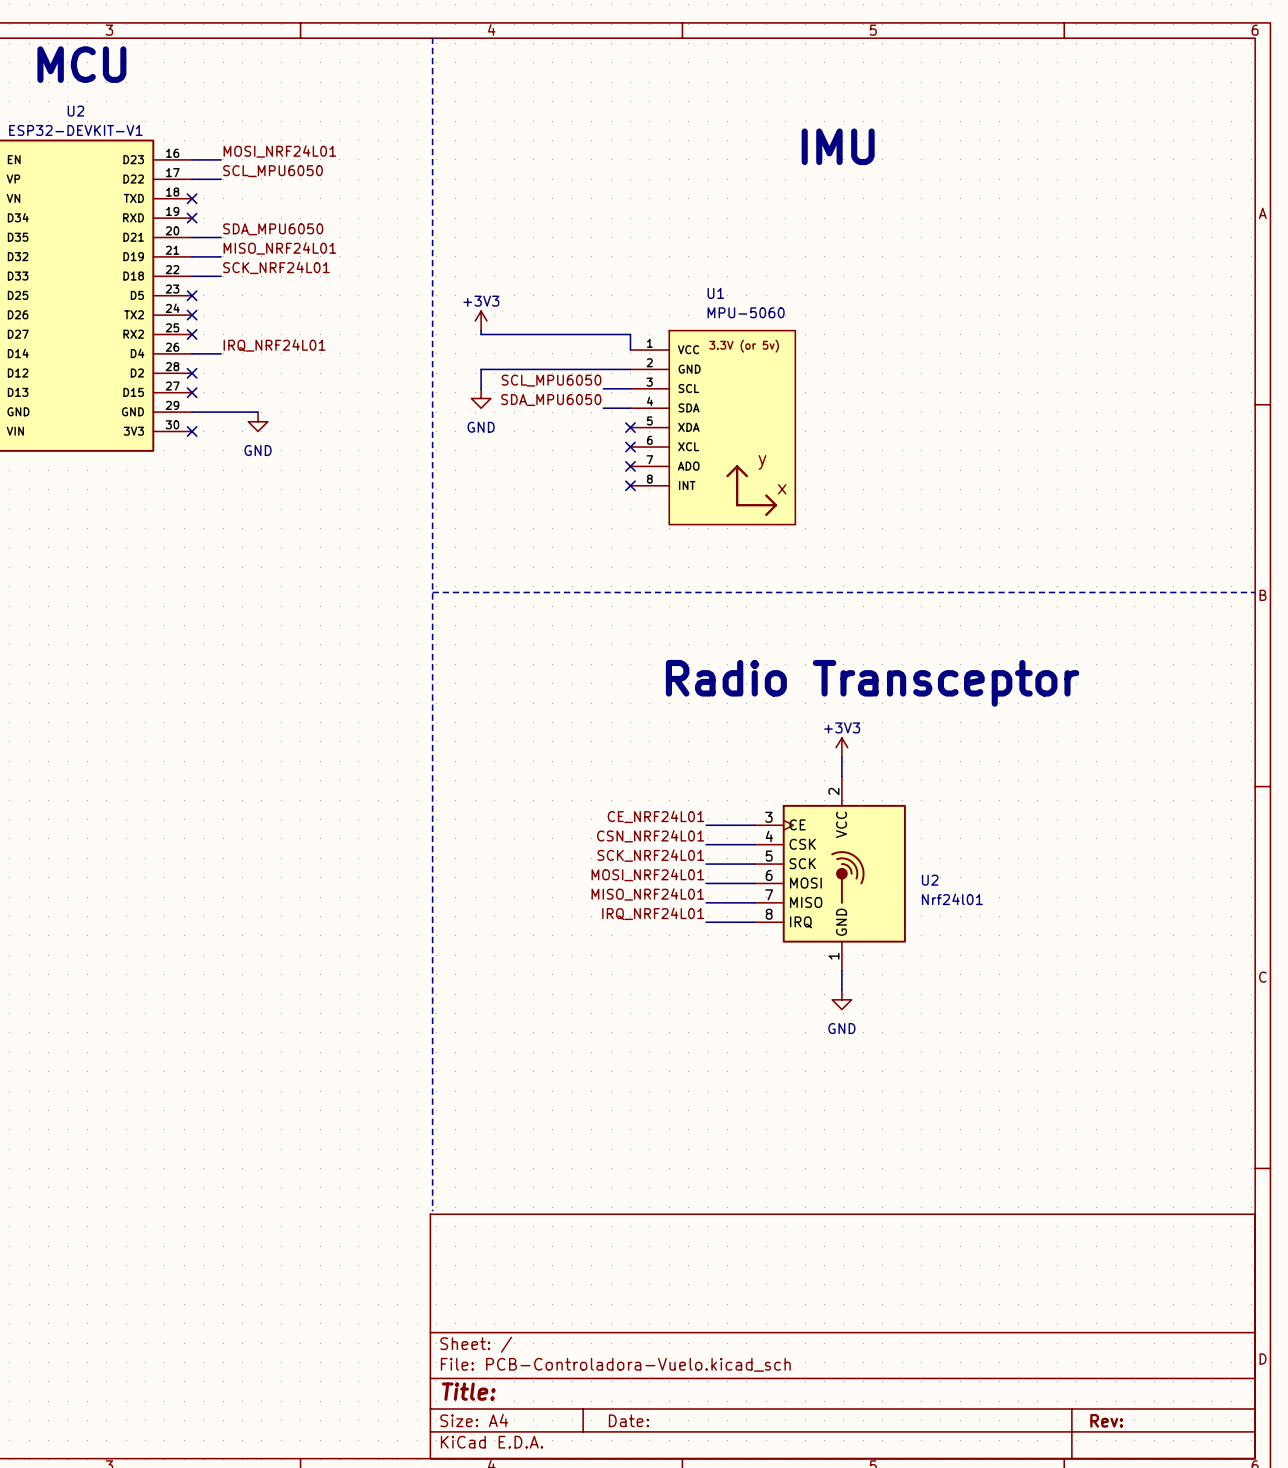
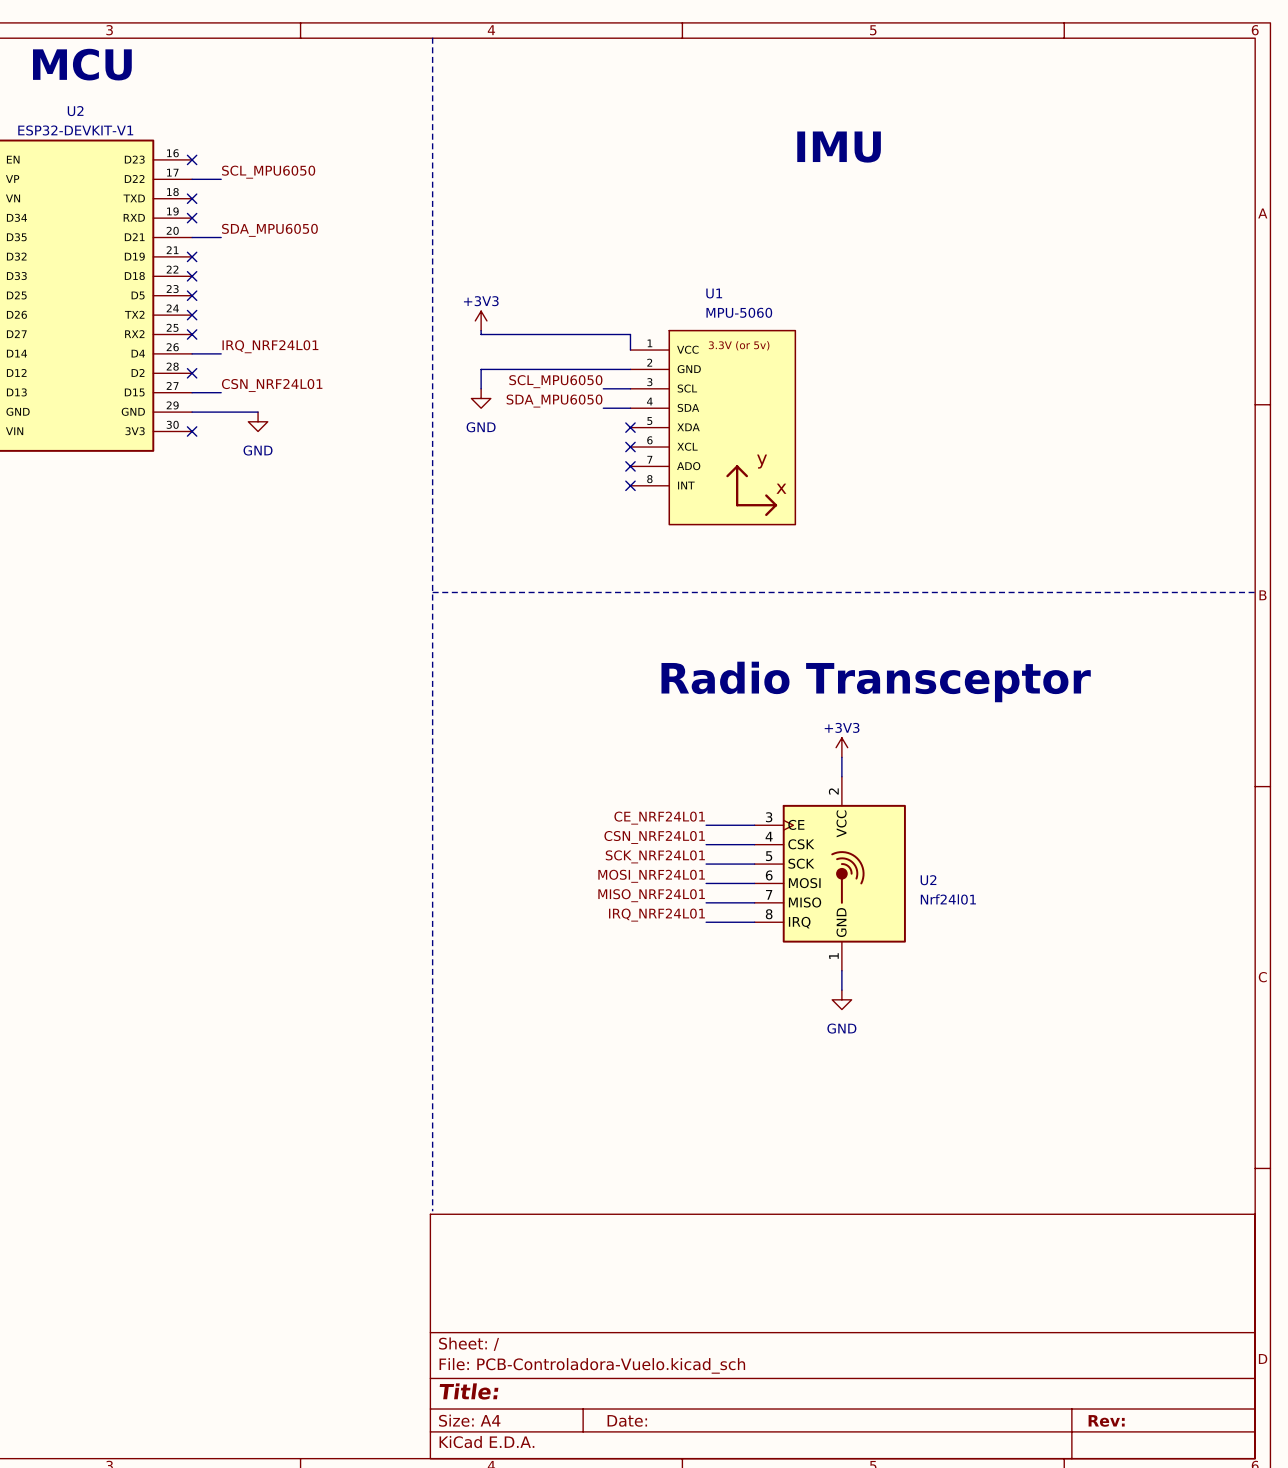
label: MOSI_NRF24L01 (279, 151) -> none
wire: (192, 159) (221, 159) -> none
no-connect mark: none -> (192, 159)
label: MISO_NRF24L01 (279, 248) -> none
wire: (192, 256) (221, 256) -> none
no-connect mark: none -> (192, 256)
label: SCK_NRF24L01 (276, 267) -> none
wire: (192, 276) (221, 276) -> (192, 392) (221, 392)
no-connect mark: none -> (192, 276)
label: none -> CSN_NRF24L01 (272, 385)
no-connect mark: (192, 392) -> none

